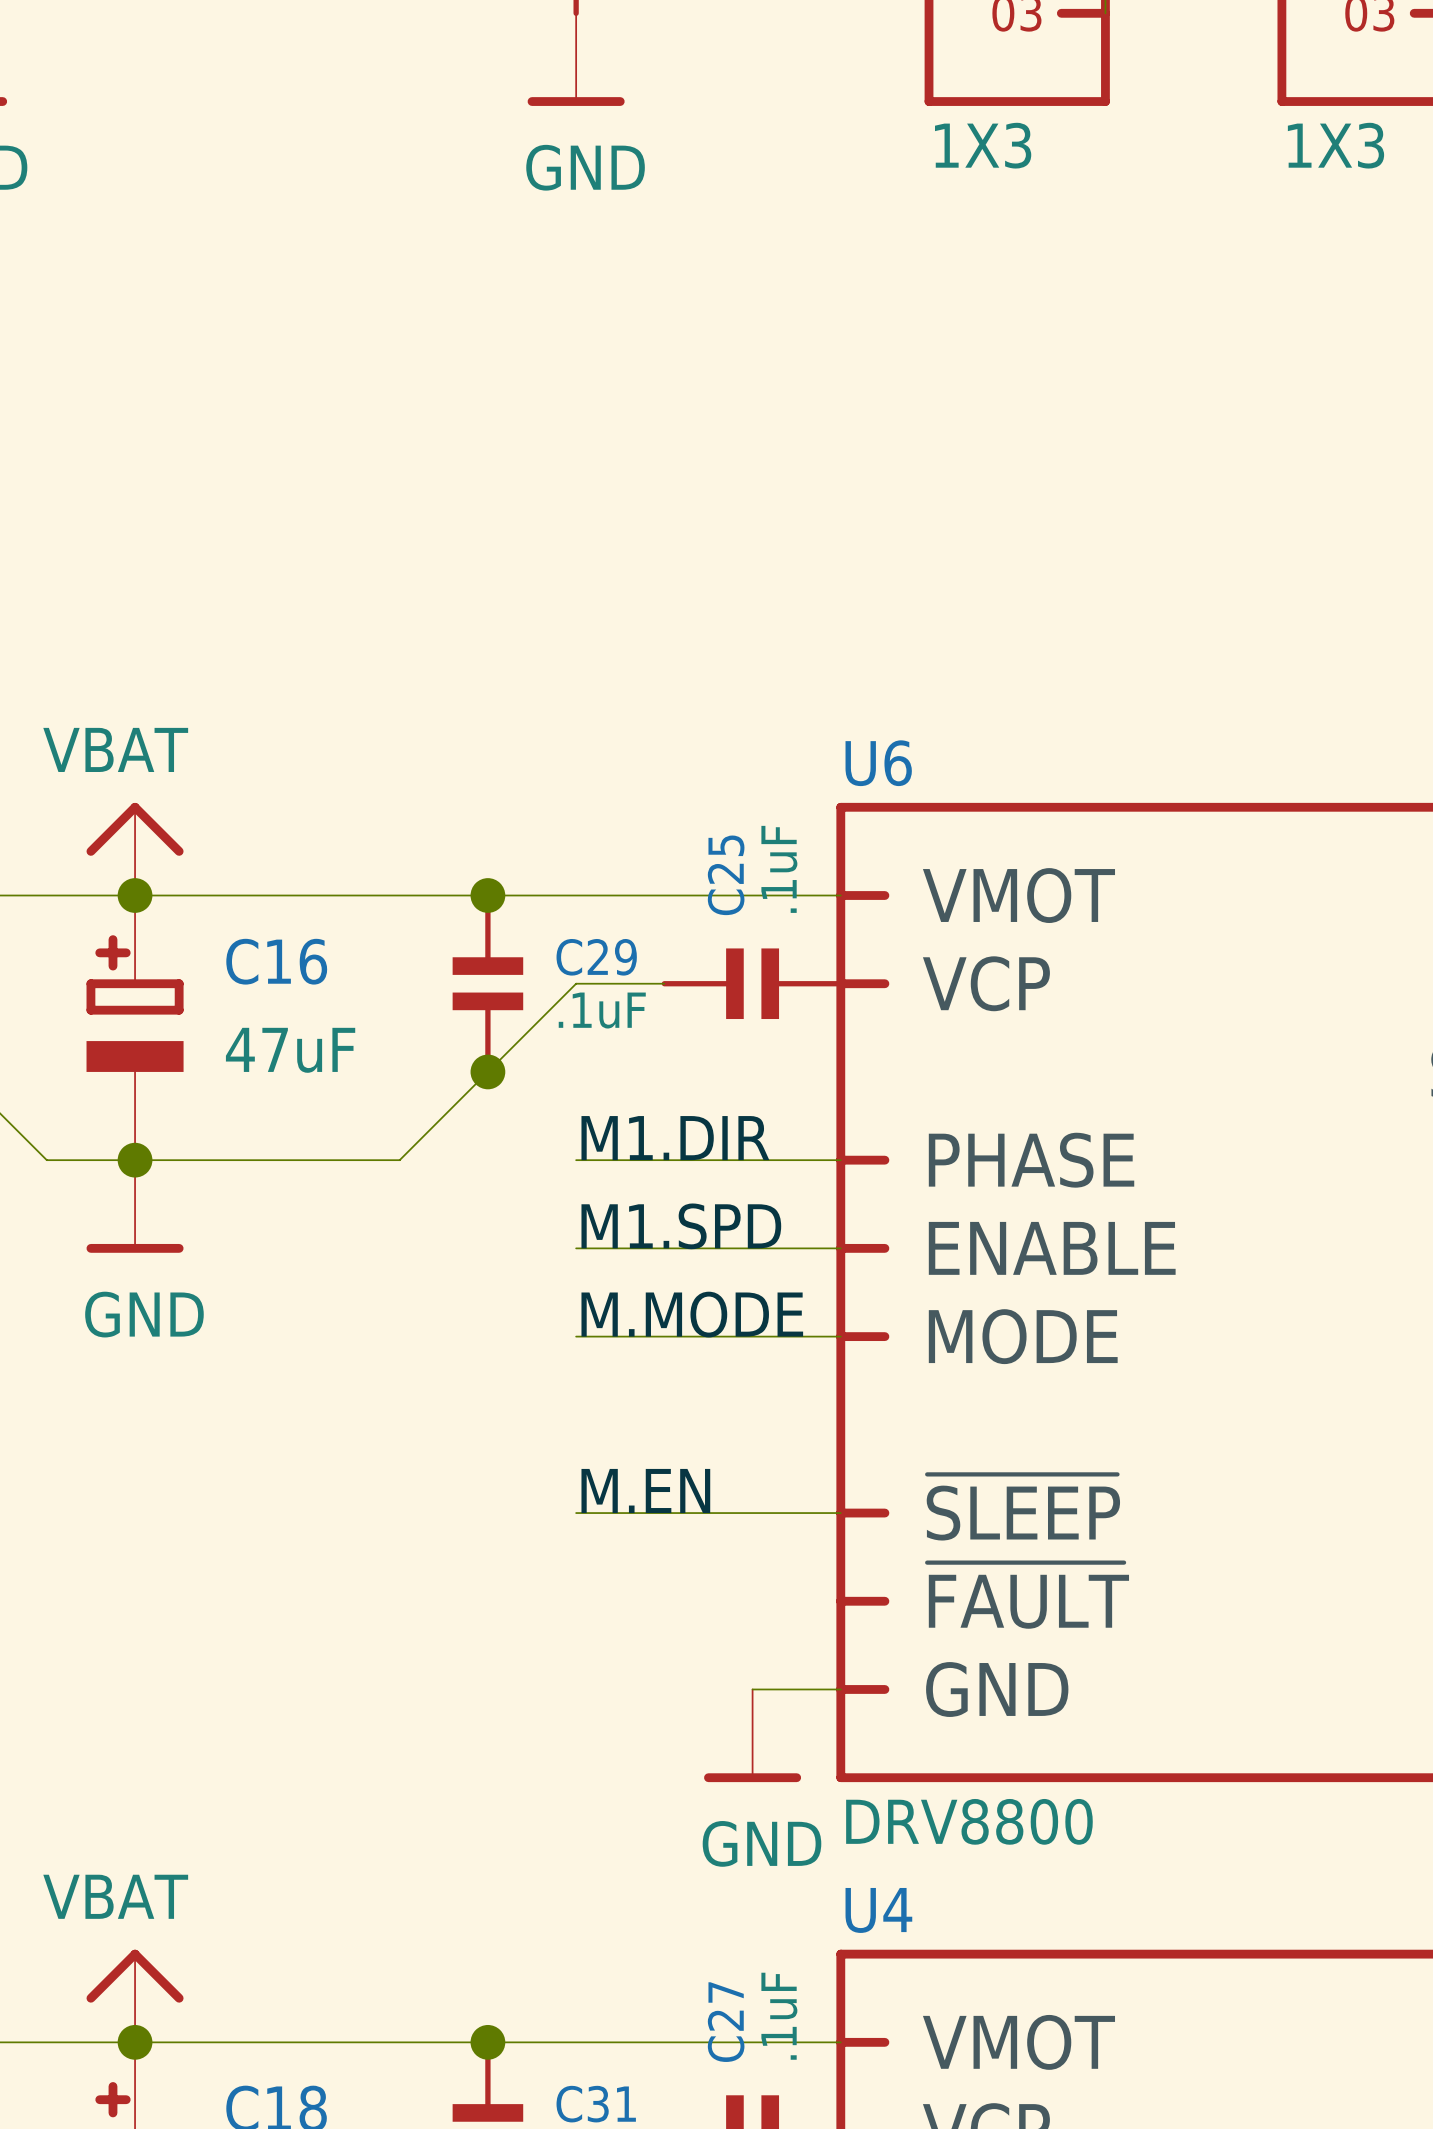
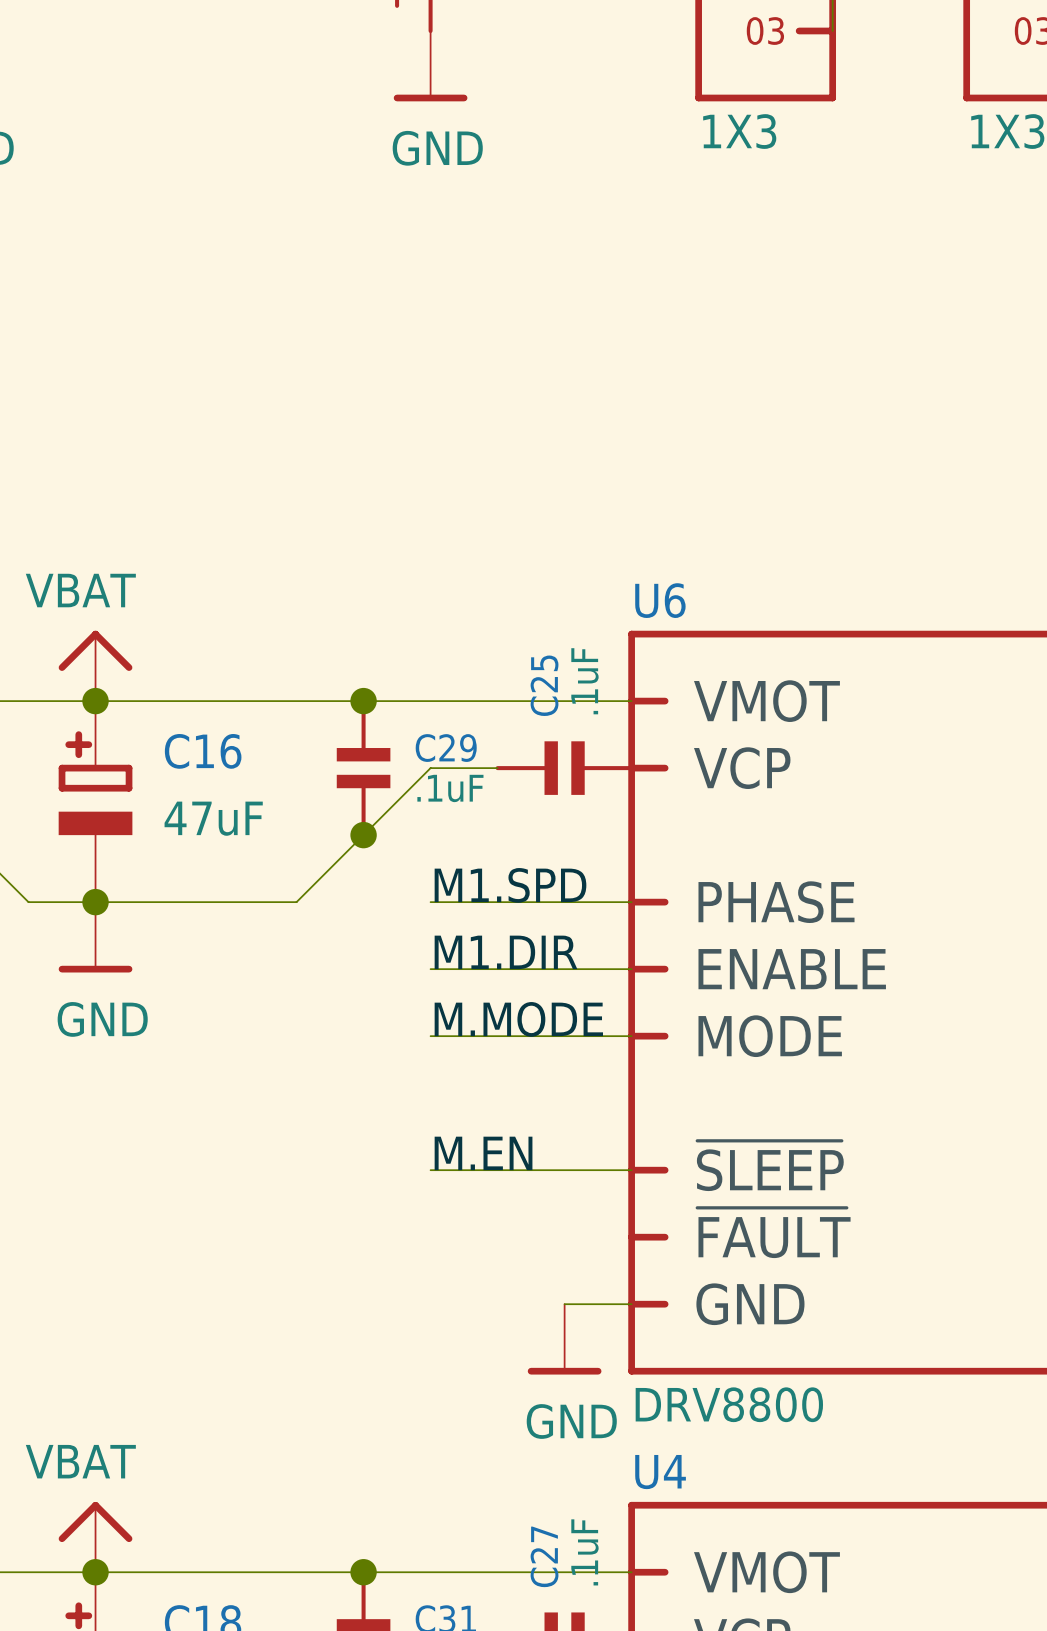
label: M1.DIR (675, 1138) -> M1.SPD (510, 885)
label: M1.SPD (681, 1226) -> M1.DIR (505, 952)

